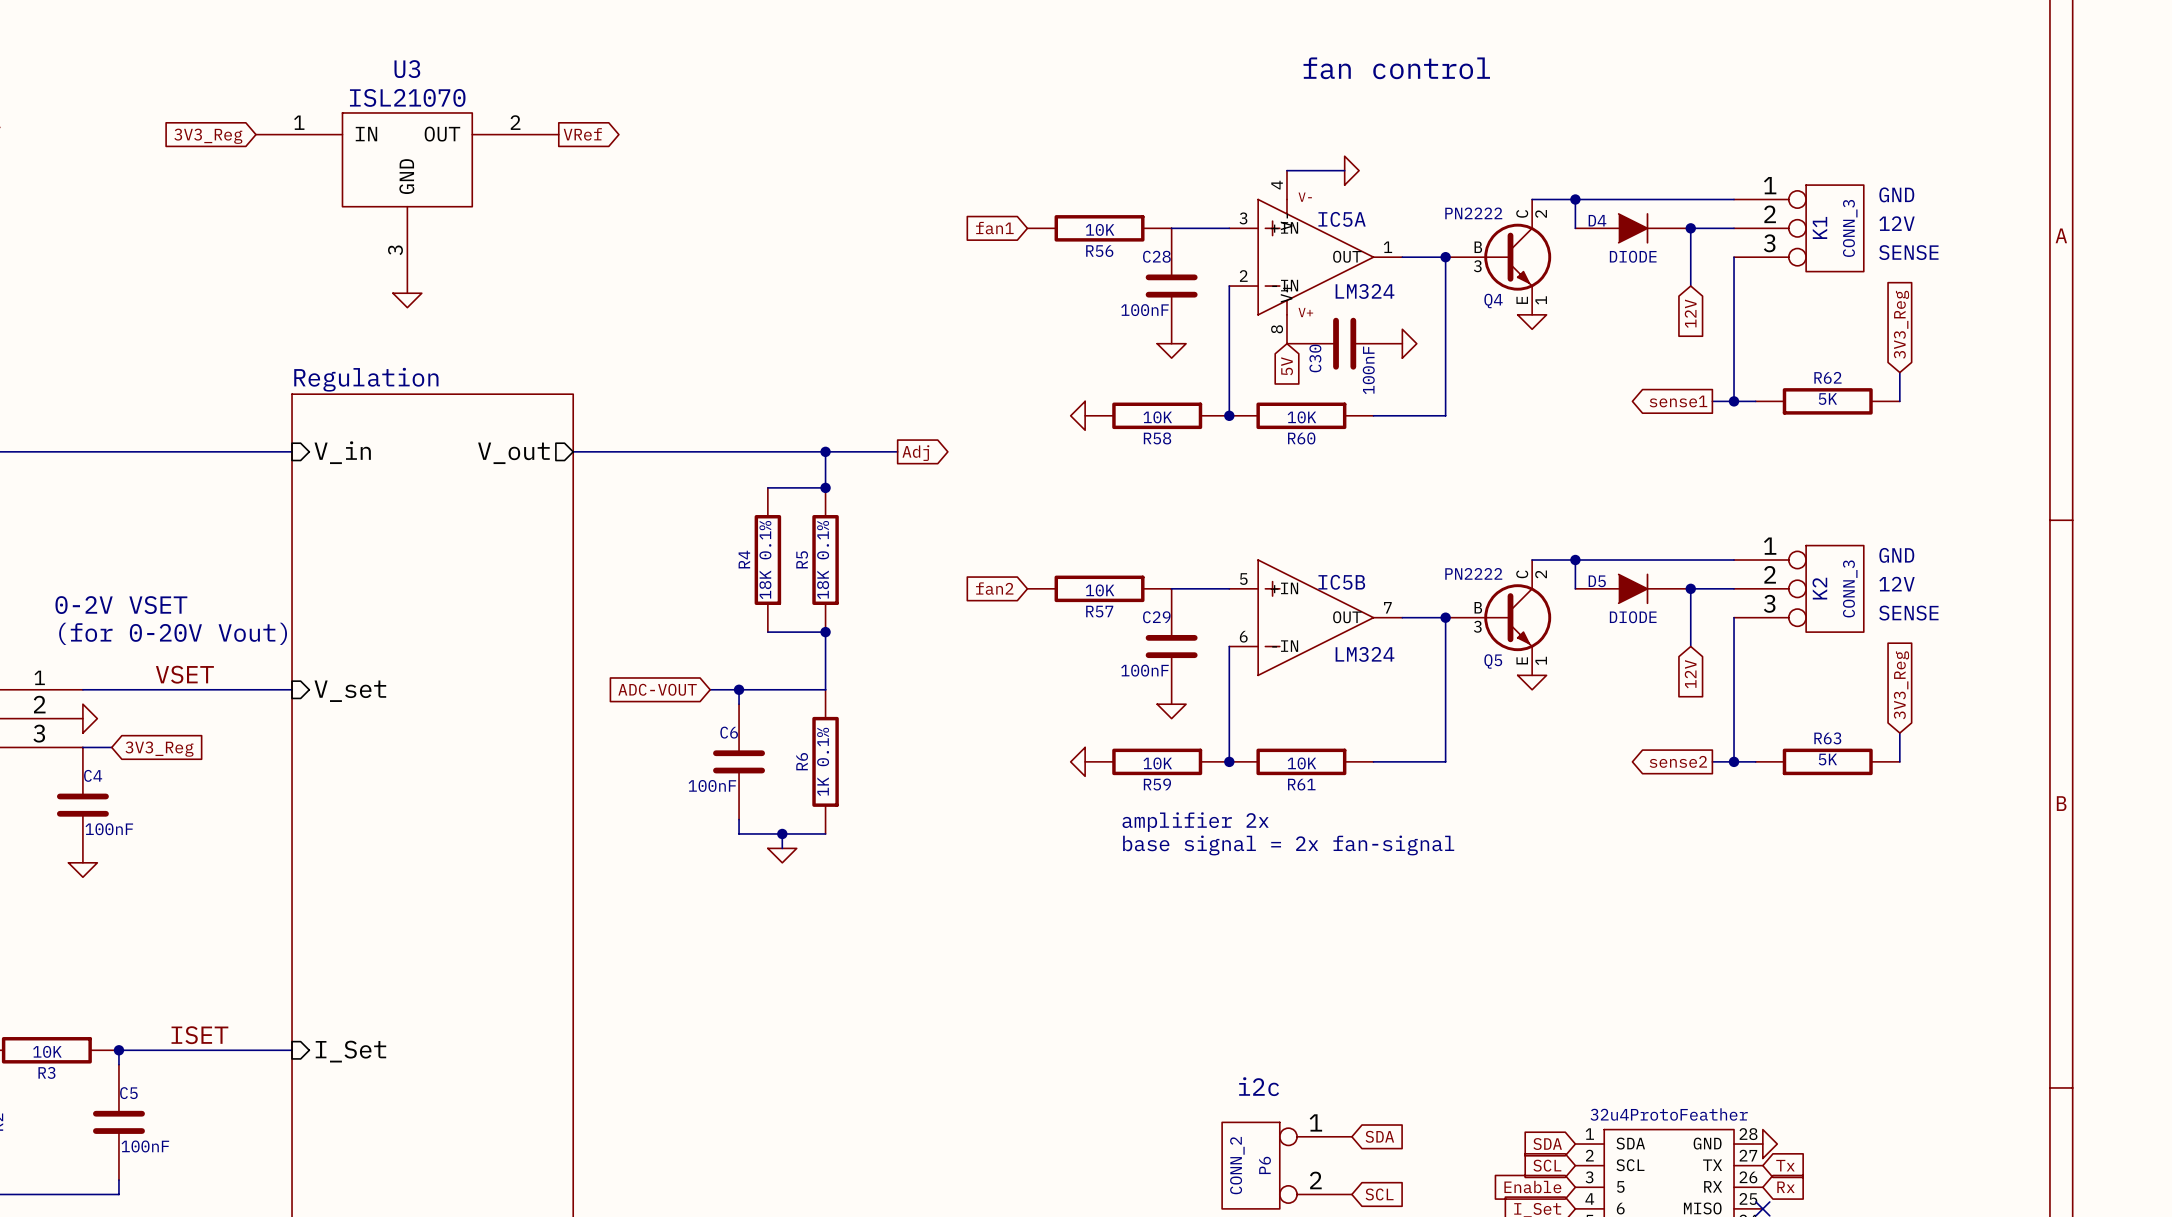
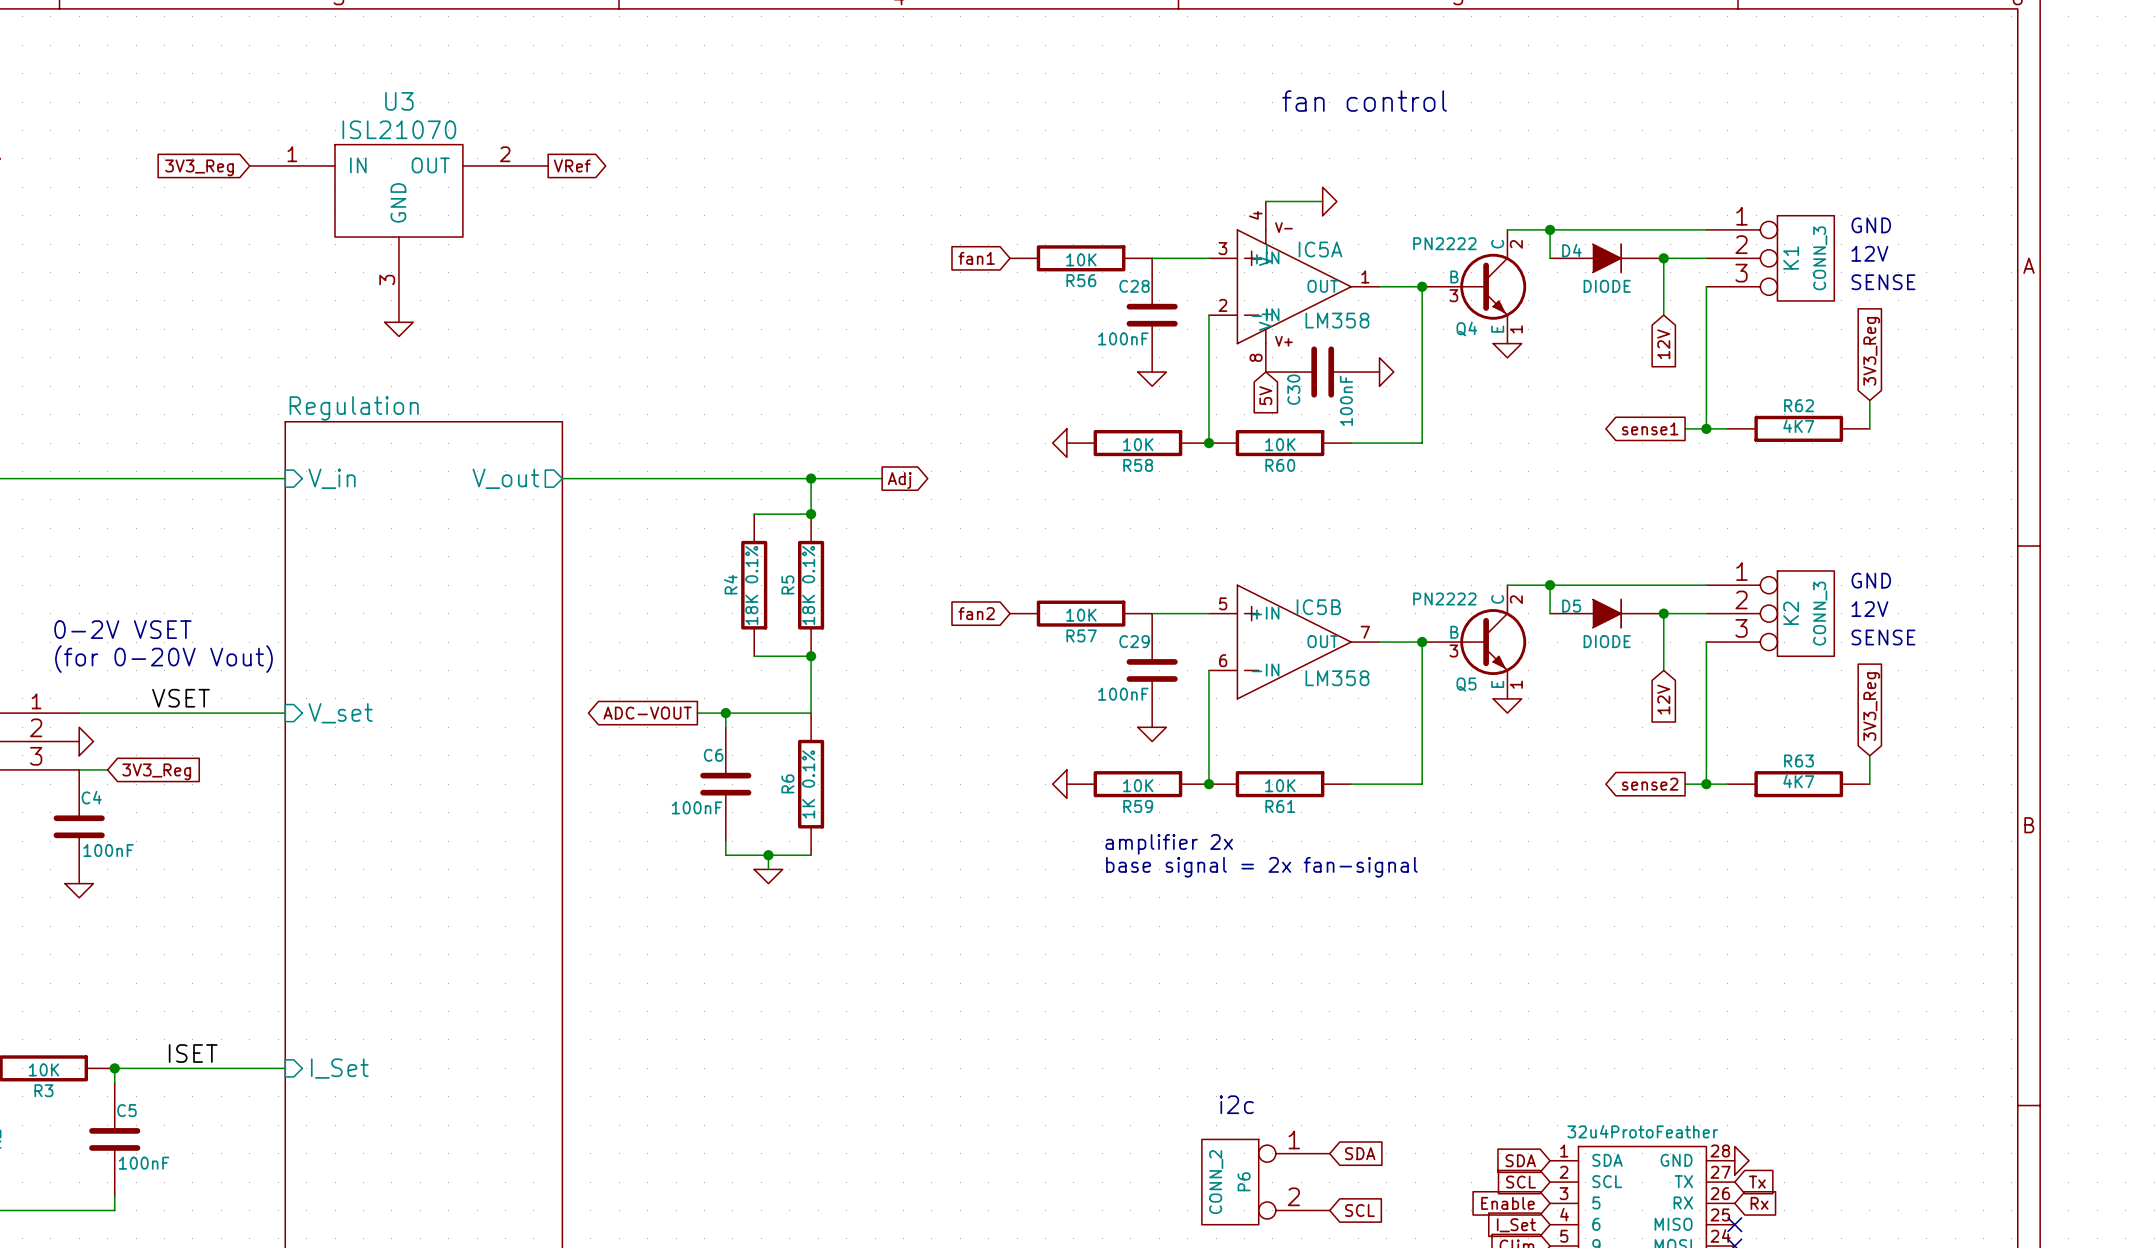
IC5A value: LM324 (1365, 291) -> LM358 (1337, 320)
R62 value: 5K (1827, 399) -> 4K7 (1798, 426)
IC5B value: LM324 (1365, 654) -> LM358 (1337, 678)
global label shape: input (657, 689) -> output (647, 713)
R63 value: 5K (1827, 759) -> 4K7 (1798, 781)

